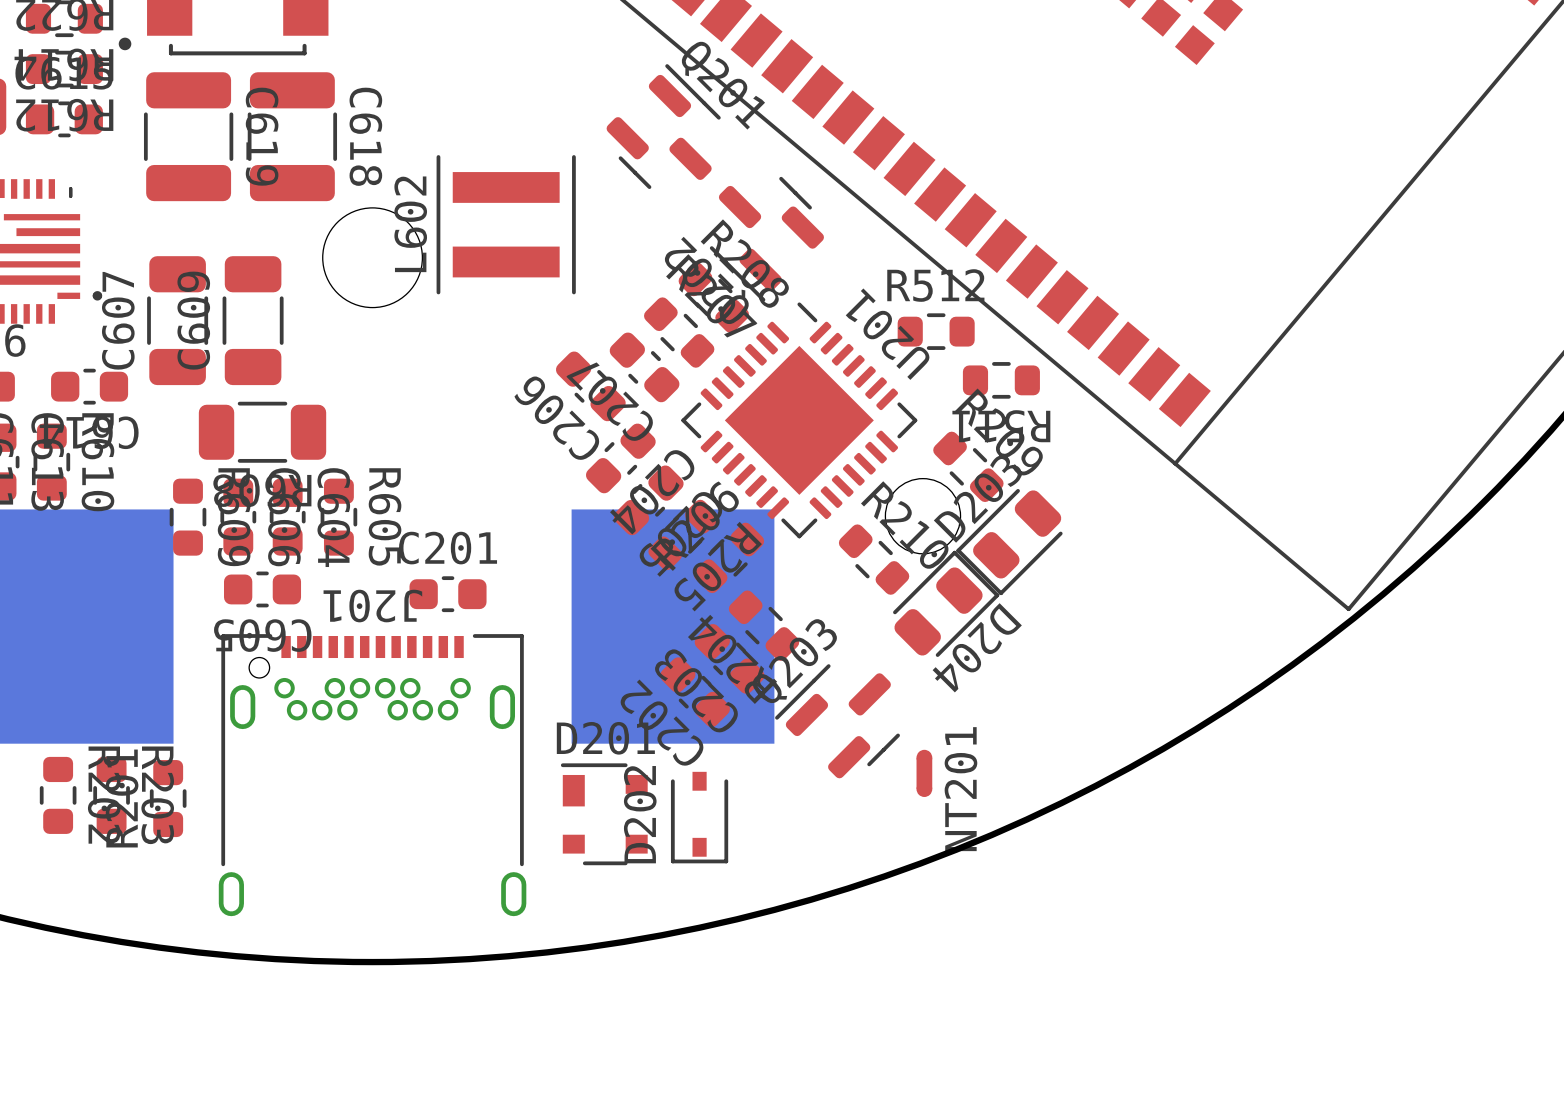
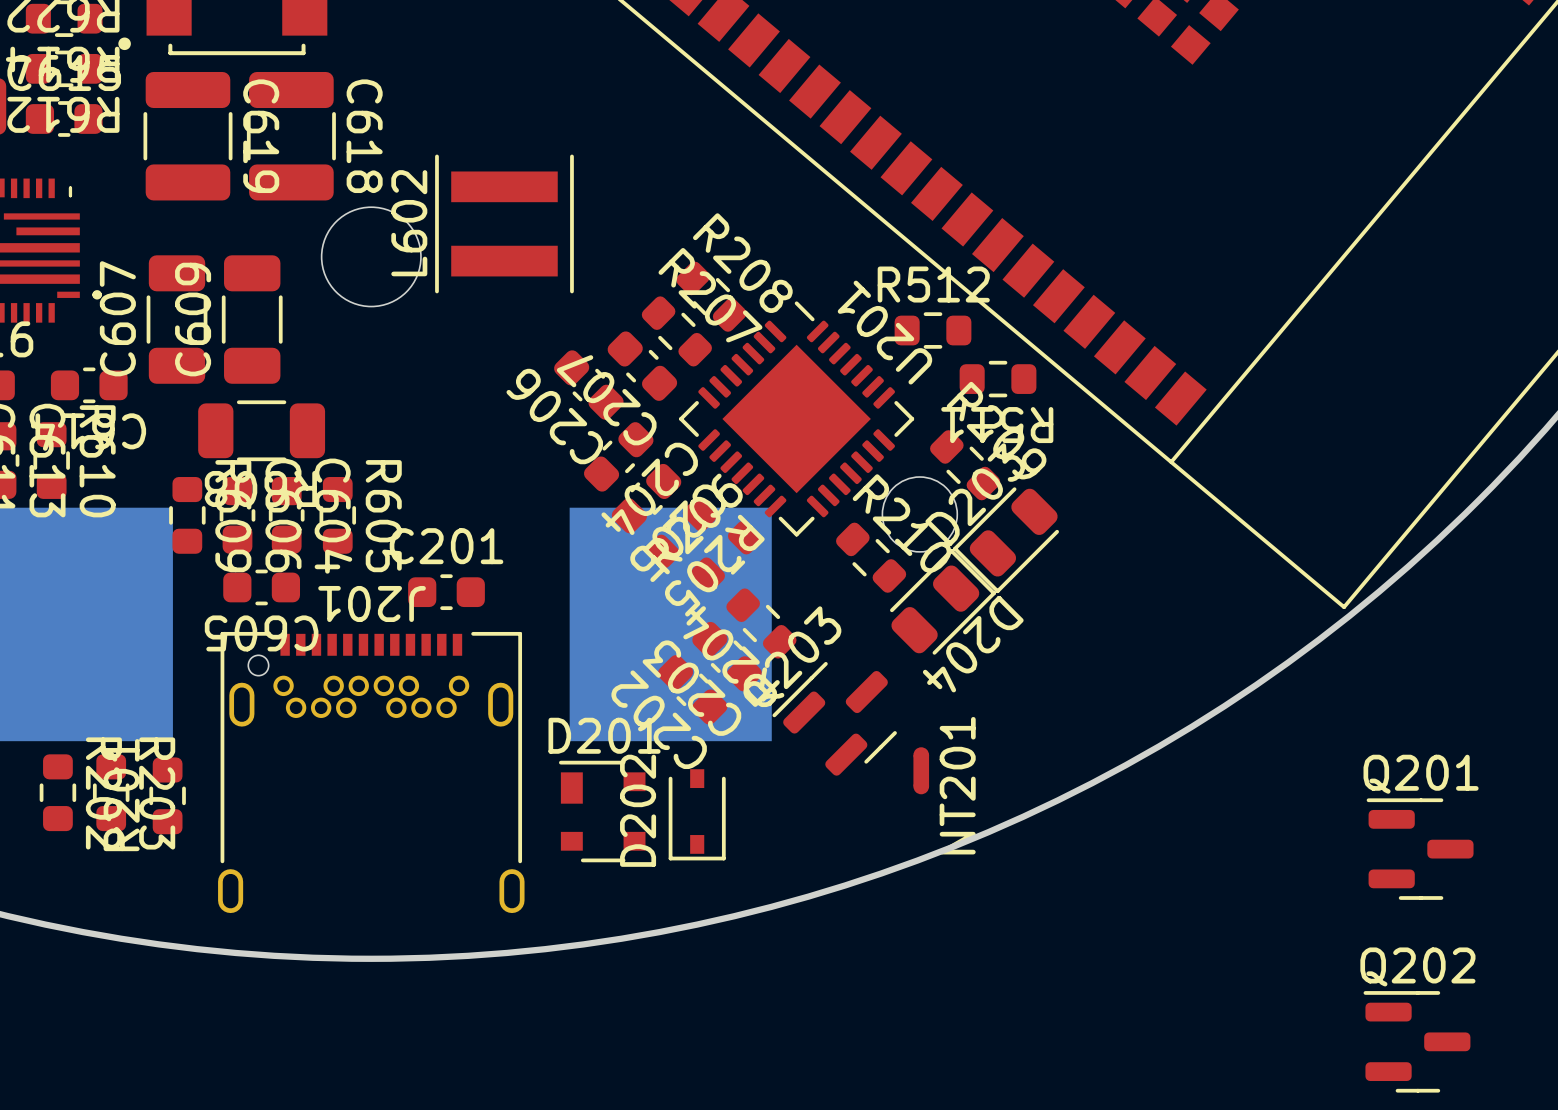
Q201 rotation: 0° (663, 126) -> 45° counterclockwise (1420, 849)
Q201 position: (663, 126) -> (1420, 849)
Q202 rotation: 0° (766, 239) -> 135° clockwise (1416, 1041)
Q202 position: (766, 239) -> (1416, 1041)

